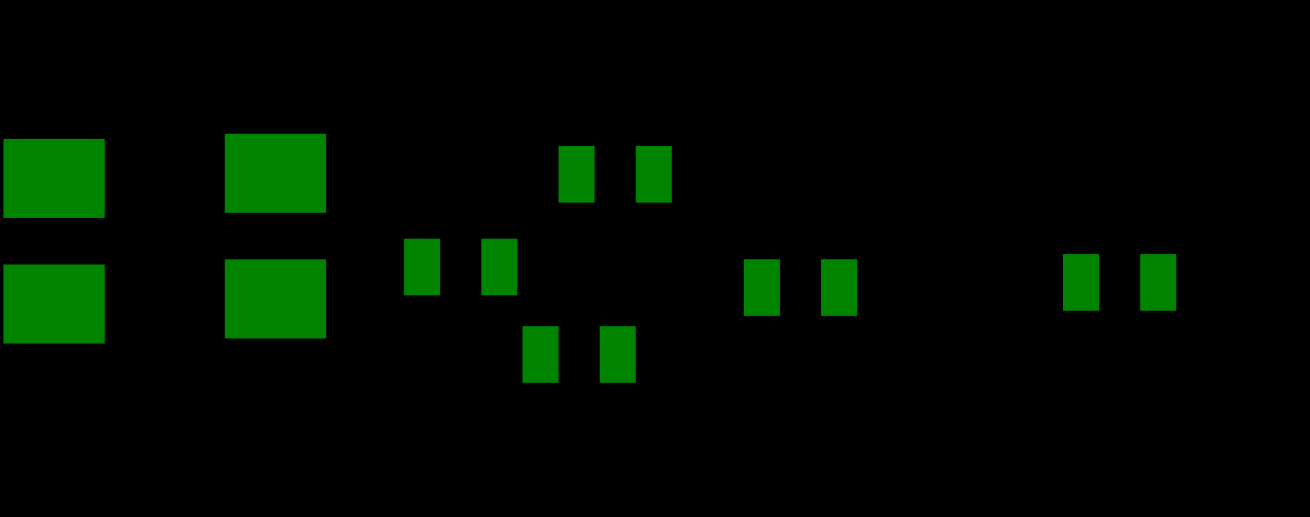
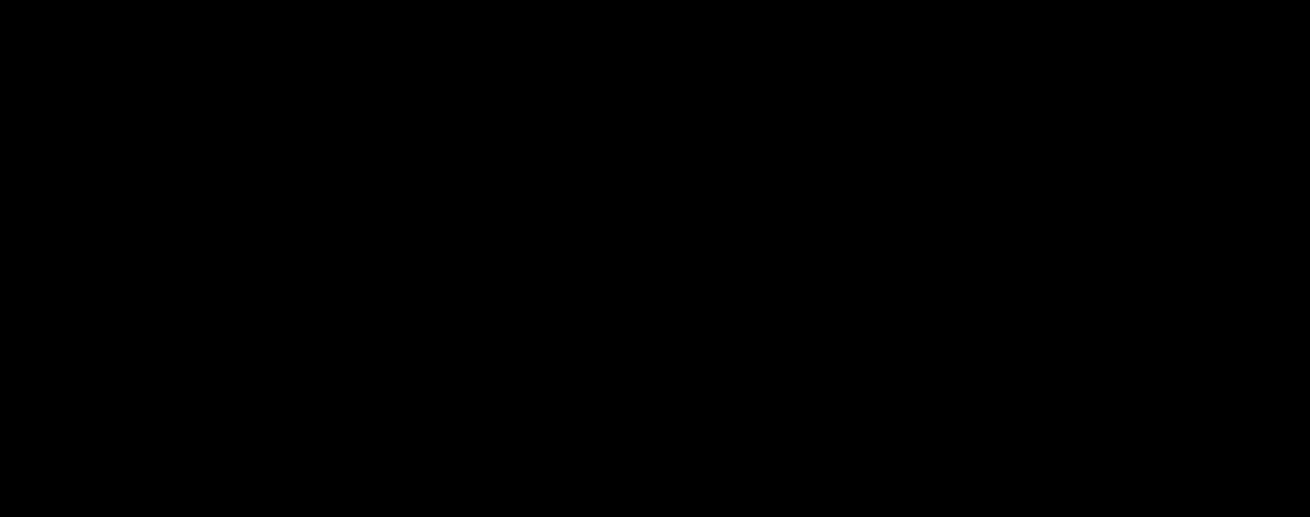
part: (615, 174) -> none
part: (275, 236) -> none
part: (54, 241) -> none
part: (460, 266) -> none
part: (1119, 282) -> none
part: (800, 287) -> none
part: (579, 354) -> none

